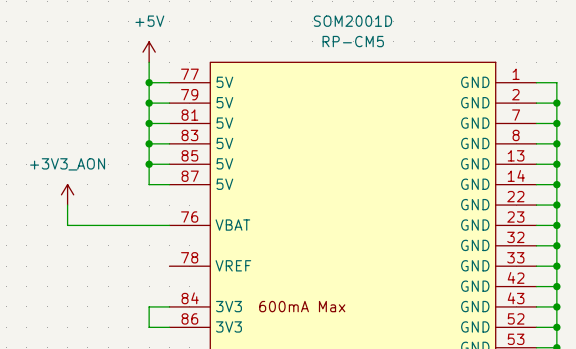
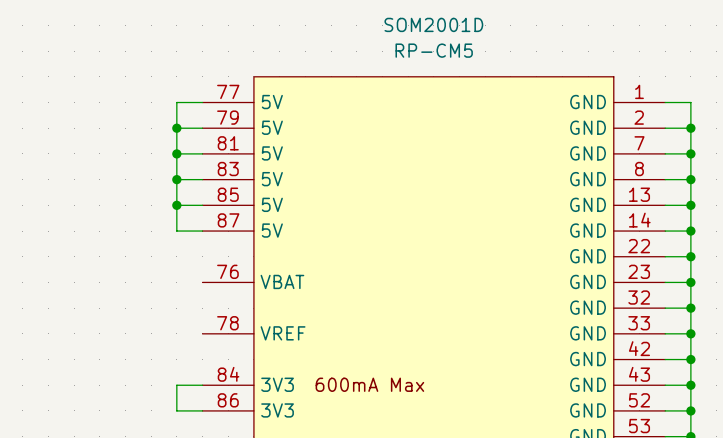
power symbol: +5V (149, 52) -> none
wire: (149, 62) (149, 82) -> none
junction: (149, 82) -> none
power symbol: +3V3_AON (67, 194) -> none
wire: (67, 205) (67, 225) (169, 225) -> none

